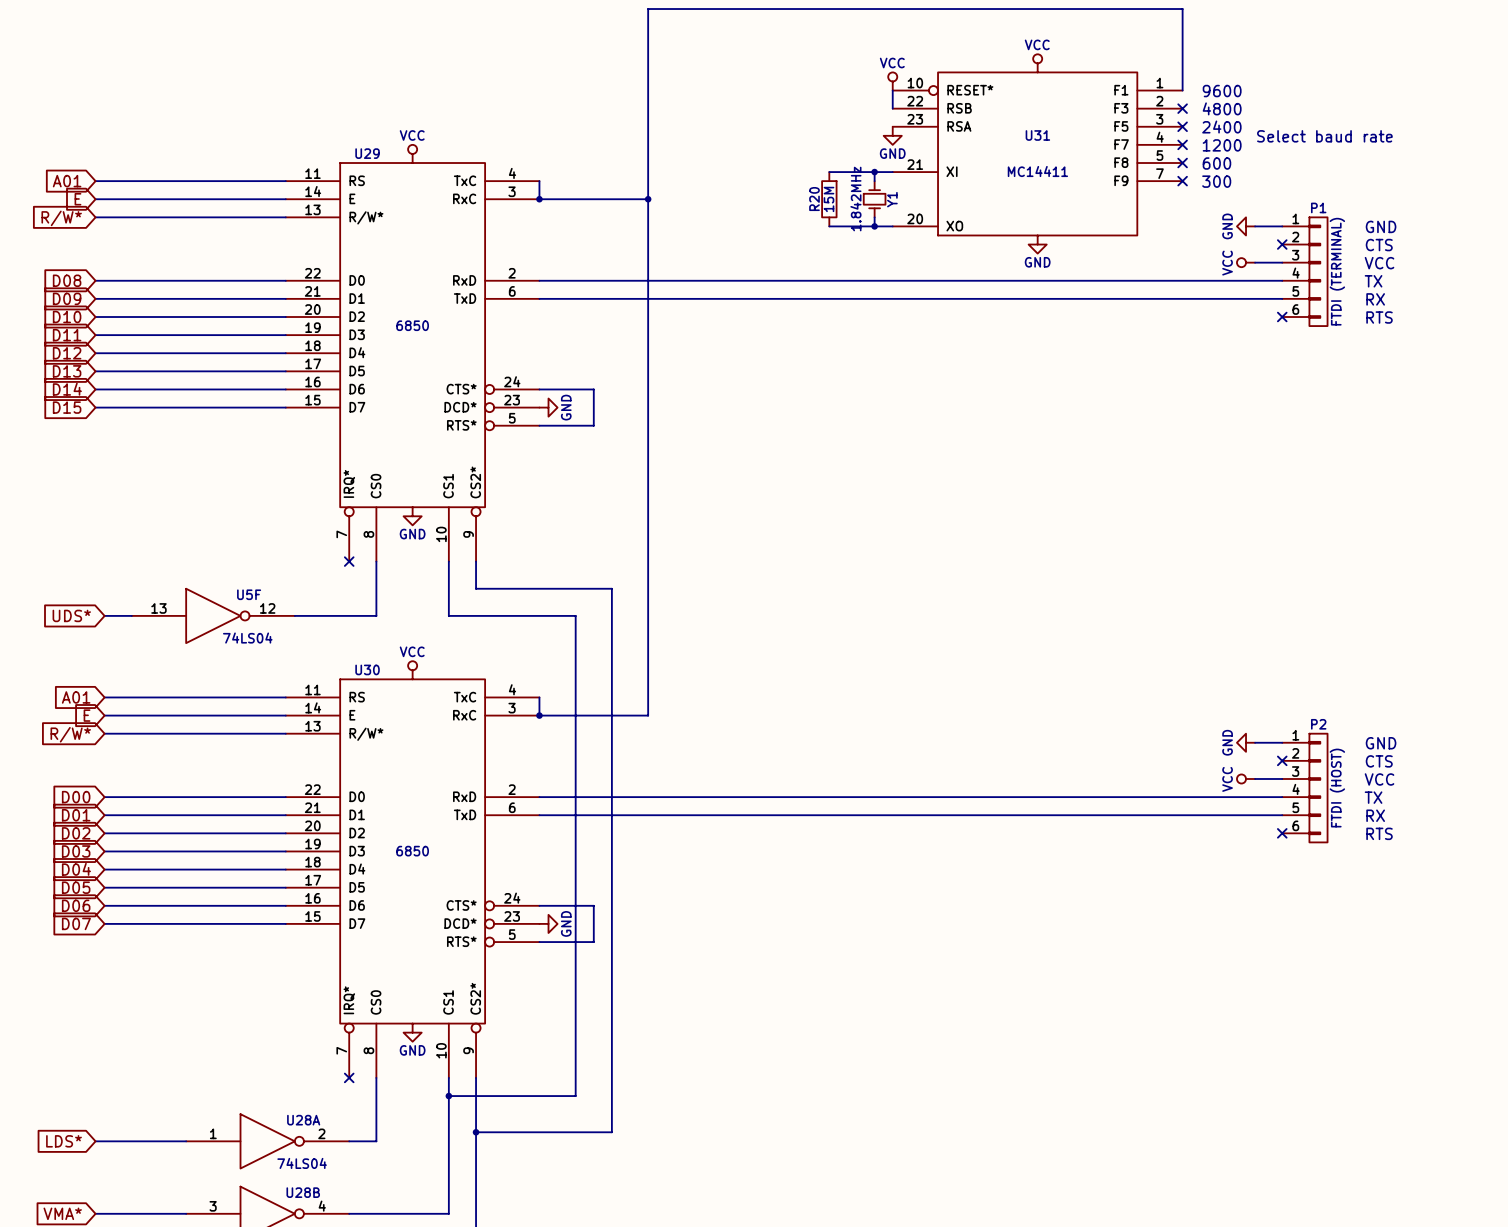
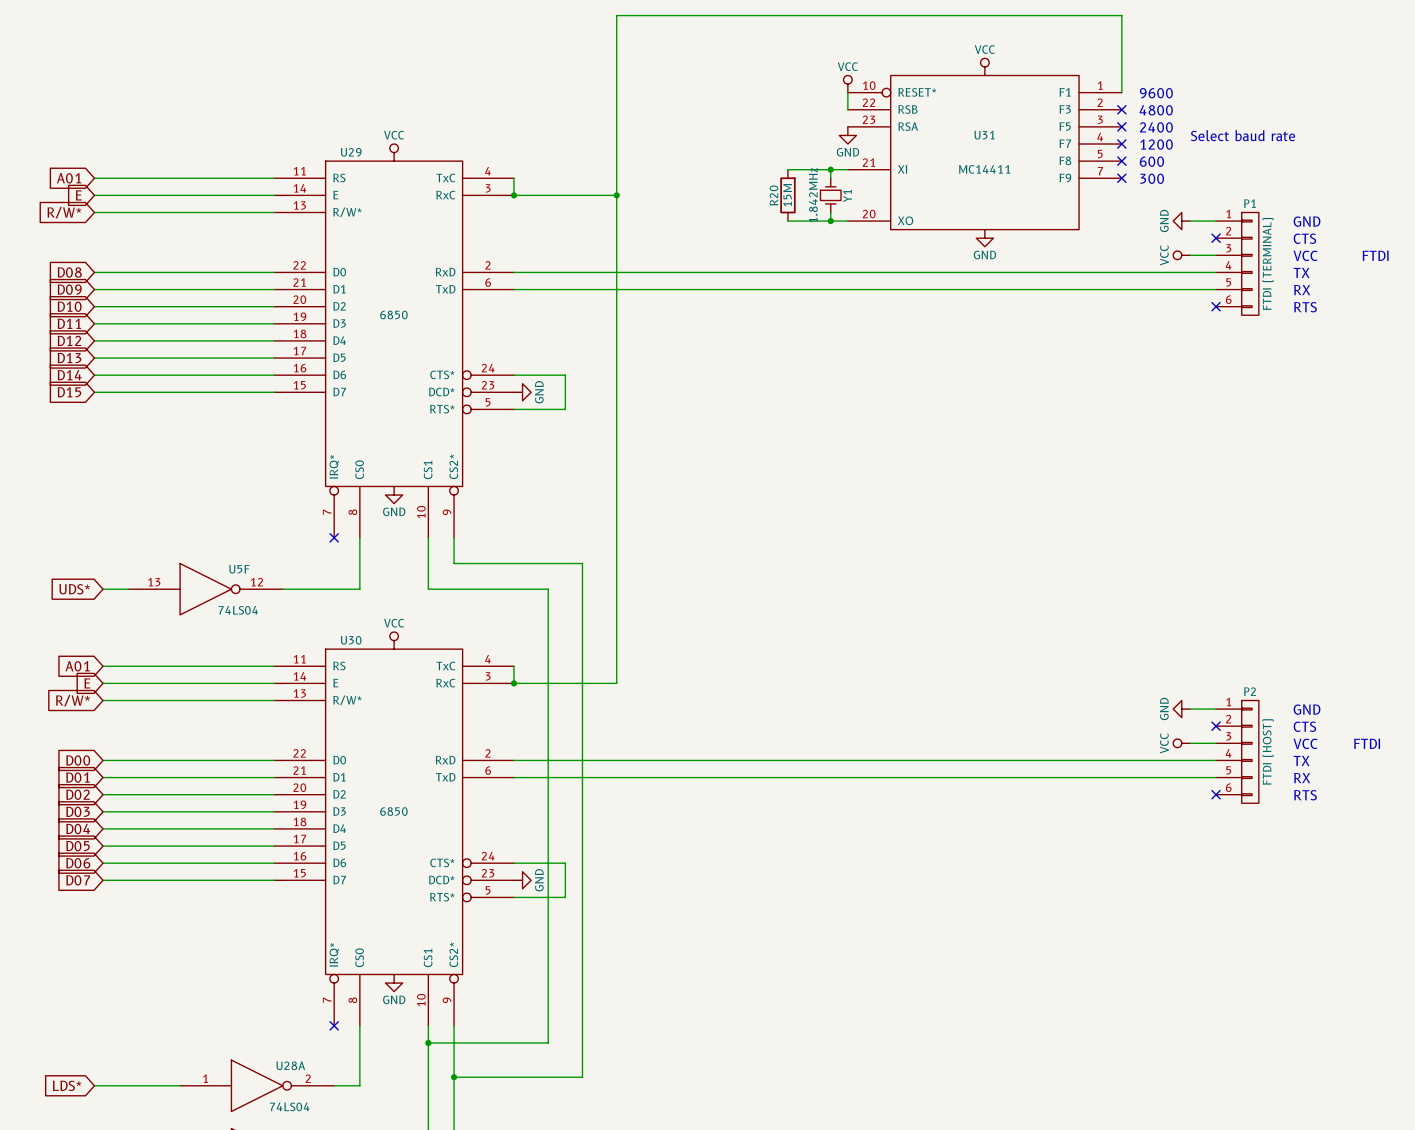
text: none -> FTDI (1375, 255)
text: none -> FTDI (1367, 743)

